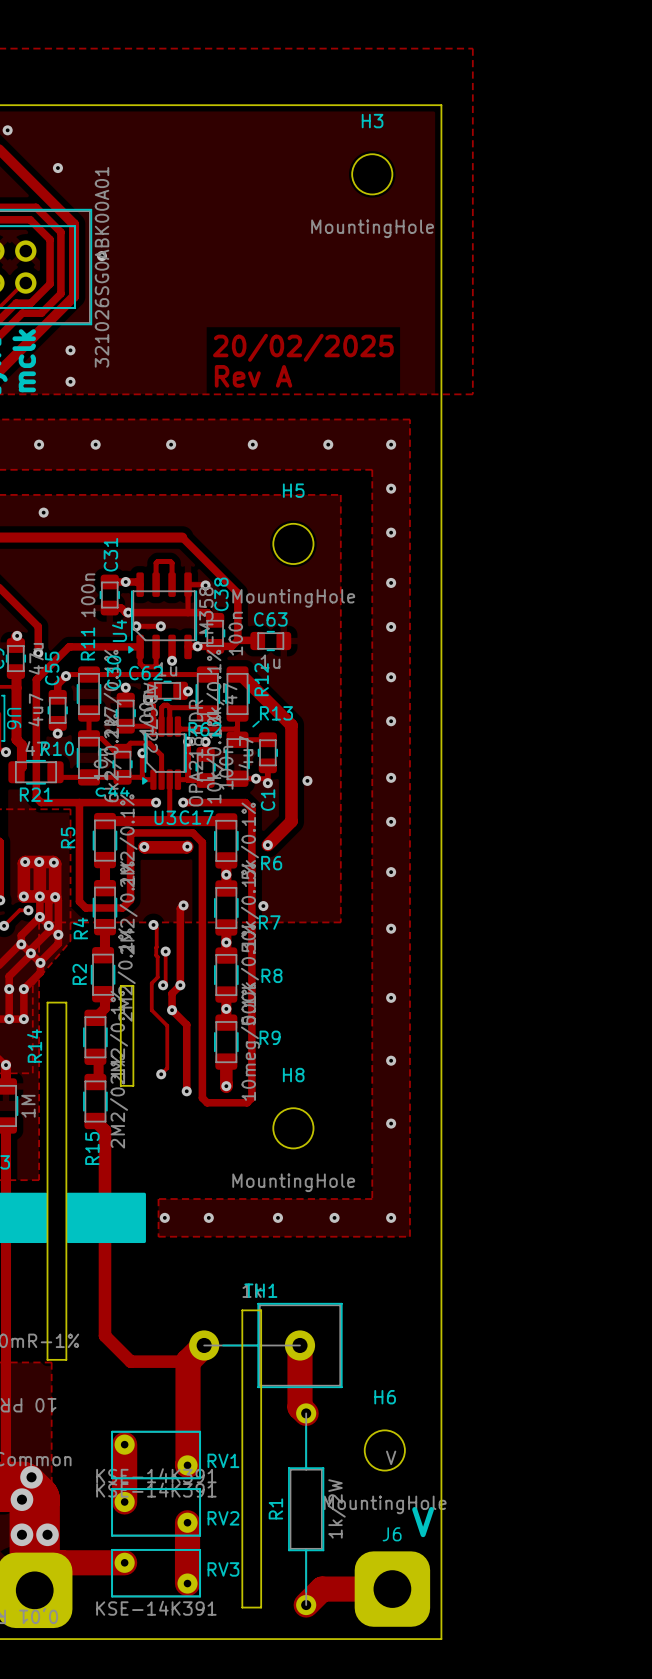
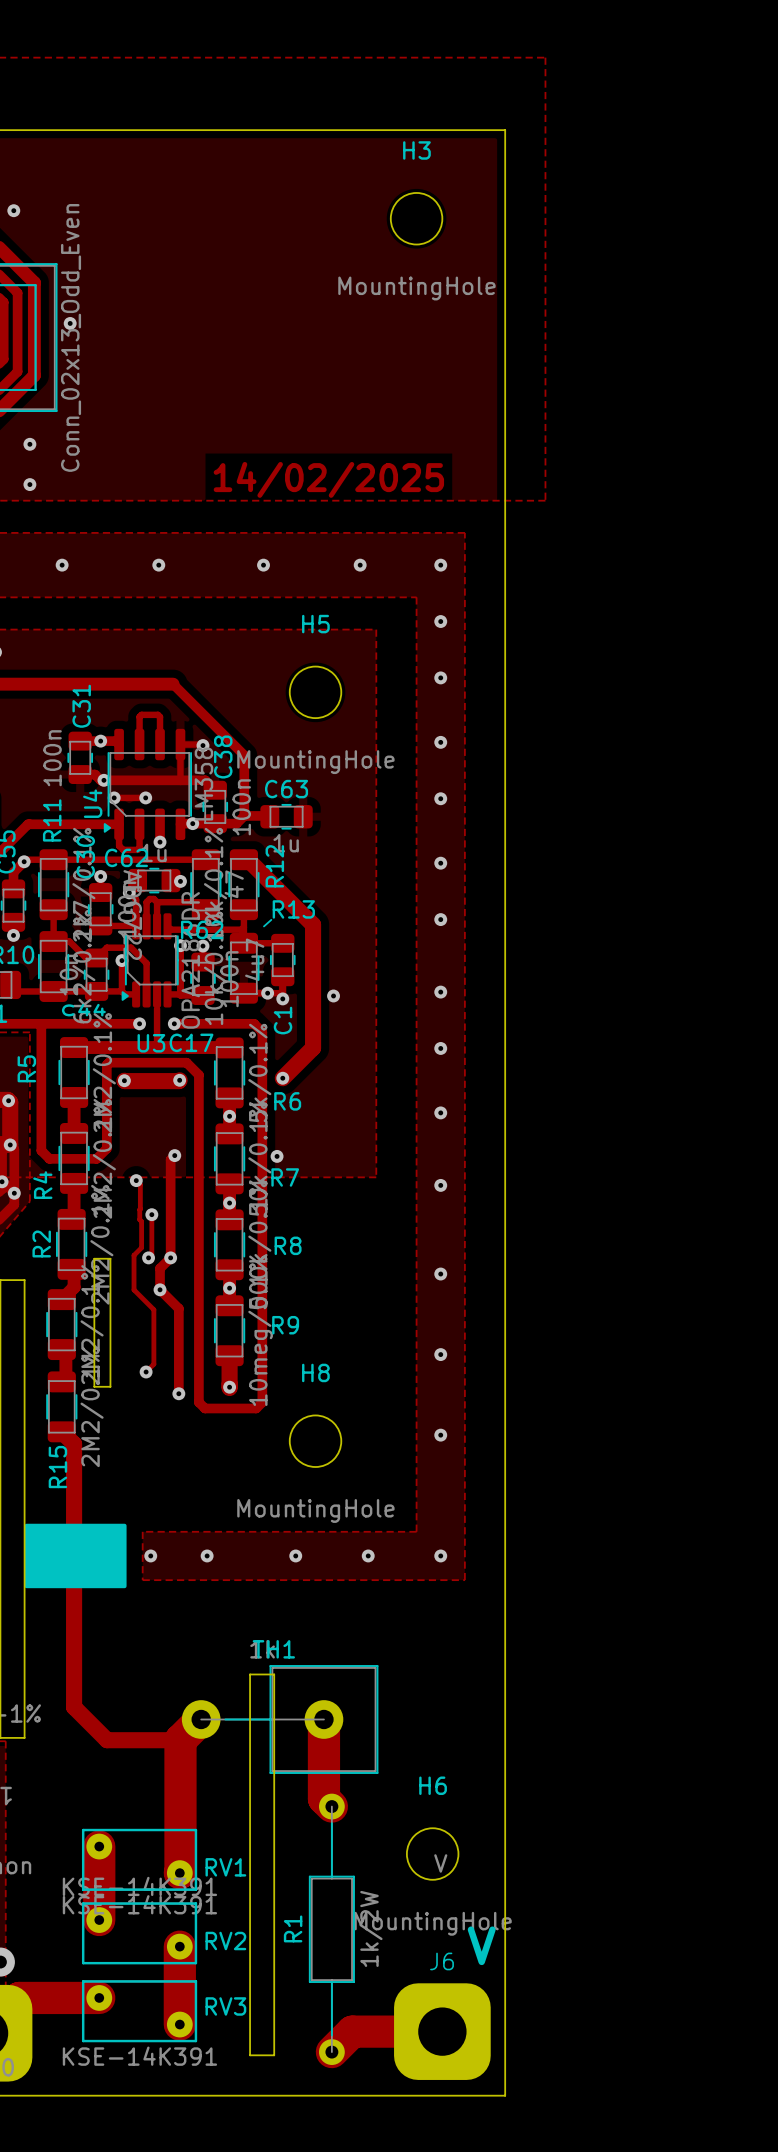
part value: 321026SG0ABK00A01 (102, 267) -> Conn_02x13_Odd_Even (71, 337)
text: 20/02/2025 (303, 347) -> none
text: Rev A (253, 376) -> 14/02/2025 (328, 479)

